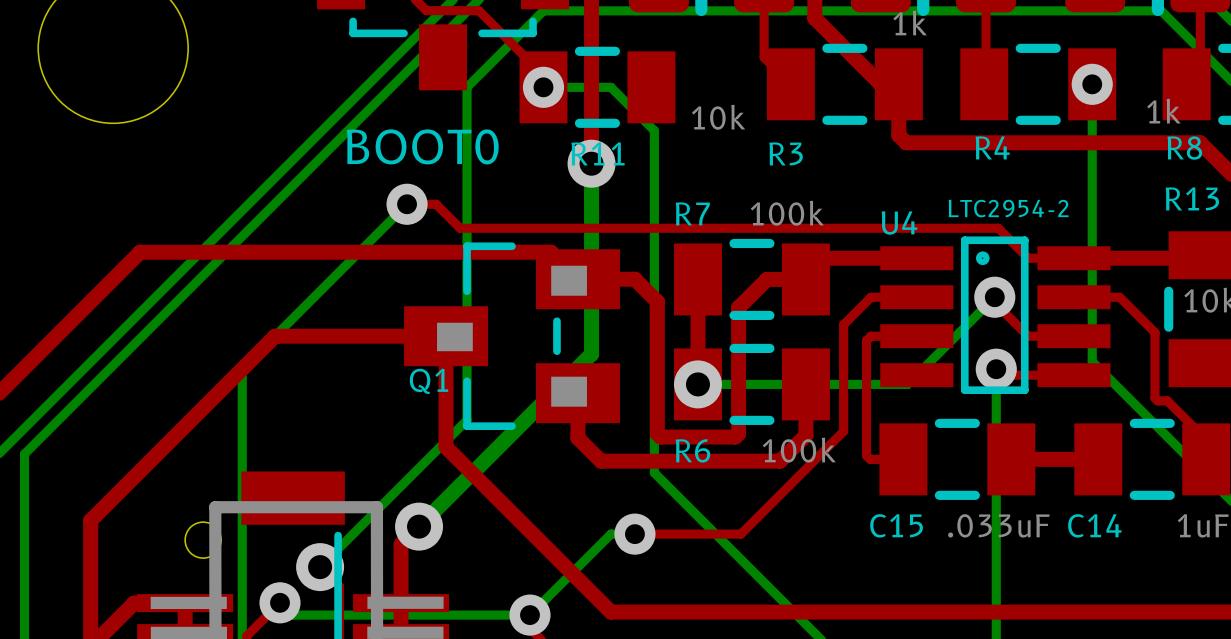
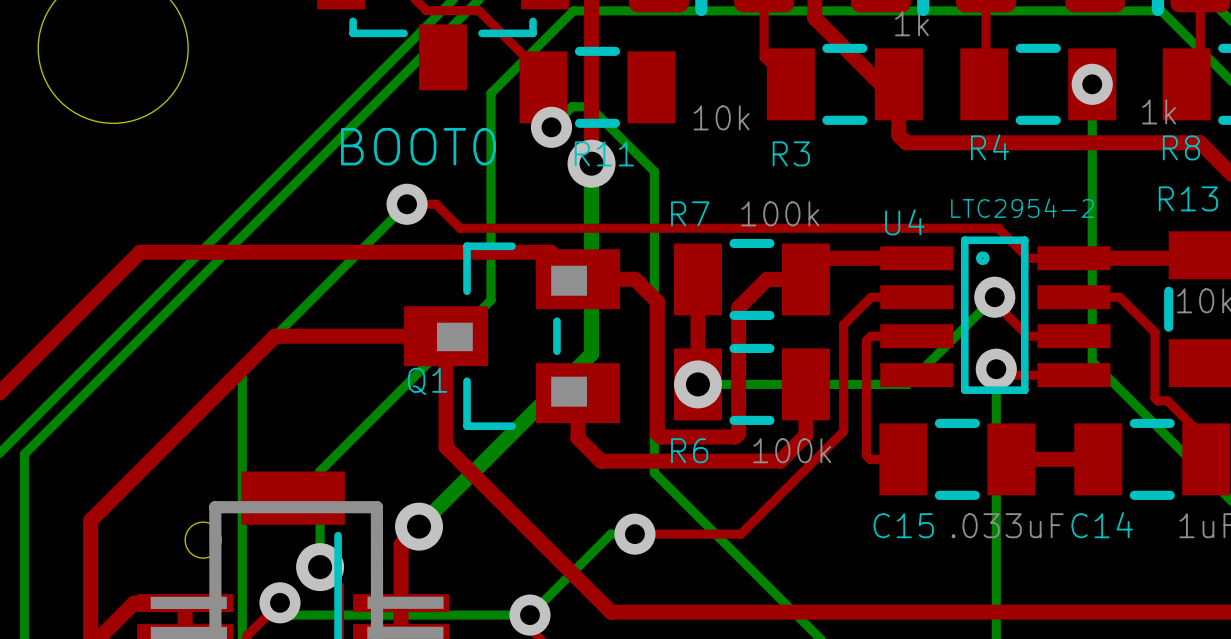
bottom track: (573, 10) (543, 10) (467, 87) (467, 420) (320, 567) -> (573, 10) (491, 93) (491, 300) (320, 471) (320, 567)
bottom track: (543, 87) (610, 87) (654, 130) (654, 171) -> (551, 127) (572, 106) (589, 106) (654, 171)
via position: (543, 87) -> (551, 127)

